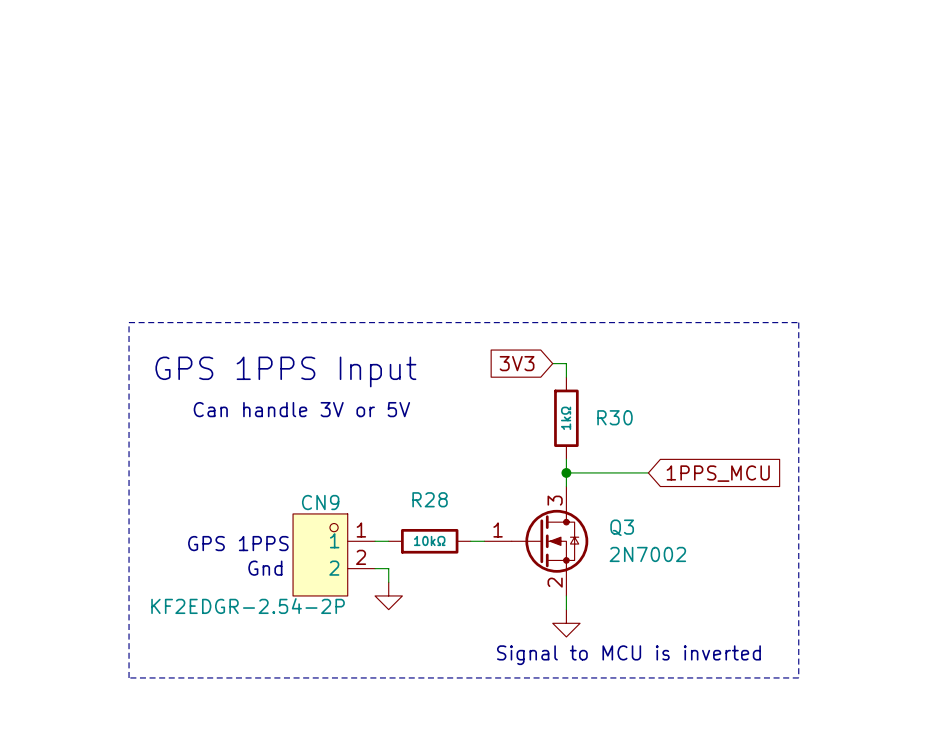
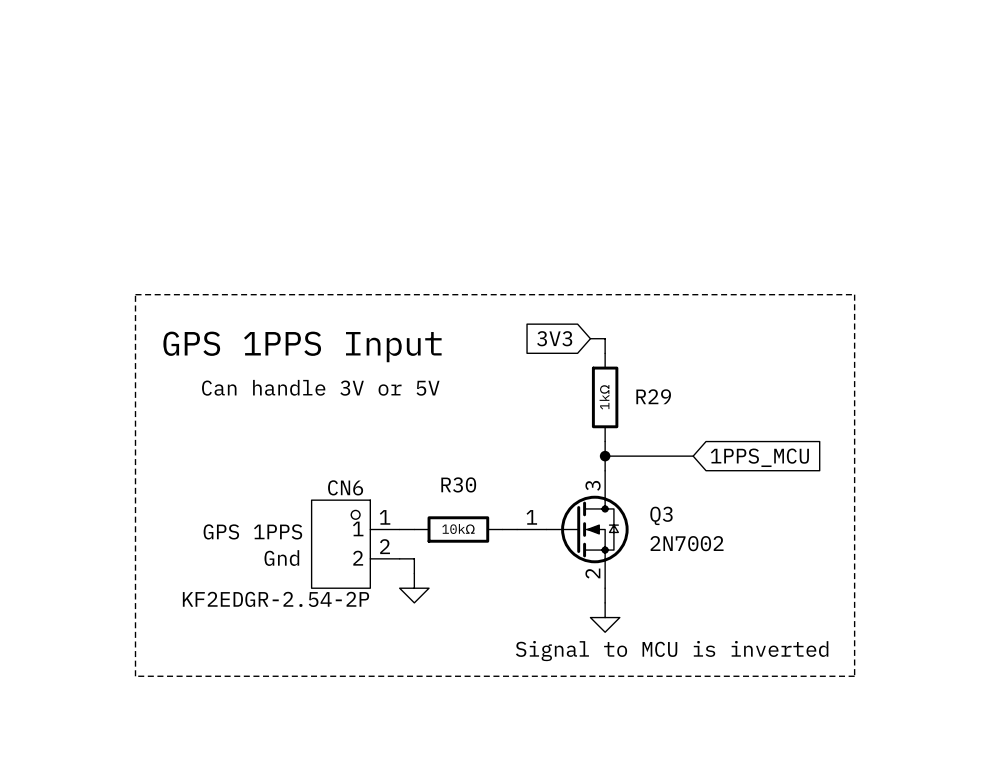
R30 name: R30 (614, 417) -> R29 (653, 396)
R28 name: R28 (430, 499) -> R30 (458, 484)
CN9 name: CN9 (320, 502) -> CN6 (345, 487)

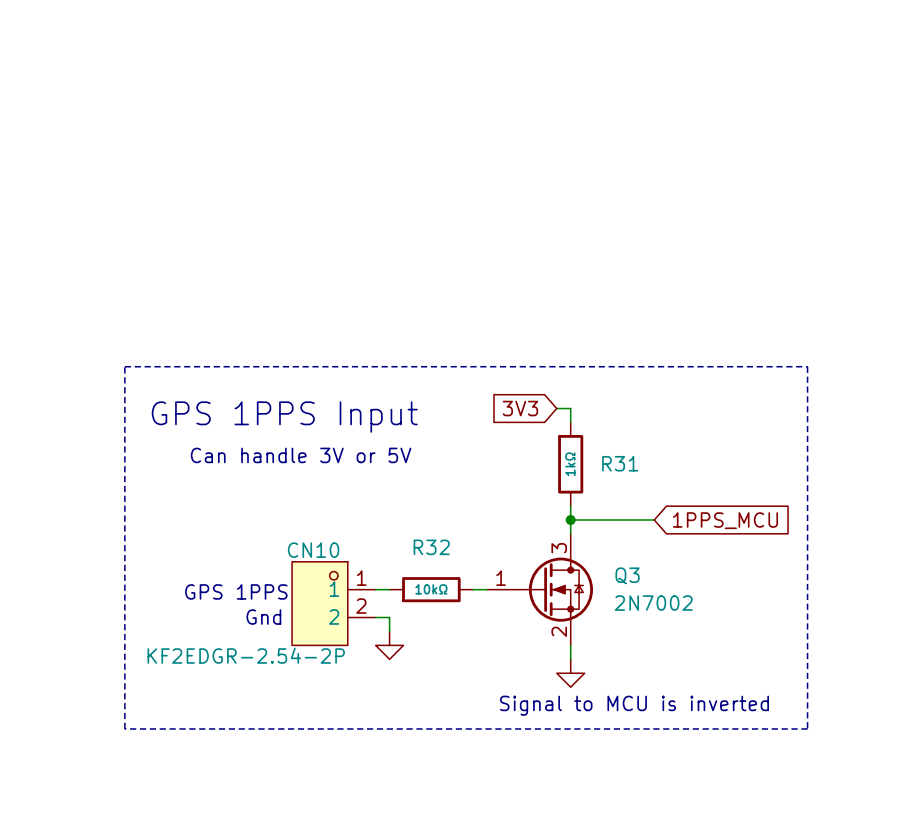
R29 name: R29 (653, 396) -> R31 (620, 463)
R30 name: R30 (458, 484) -> R32 (431, 547)
CN6 name: CN6 (345, 487) -> CN10 (313, 550)

